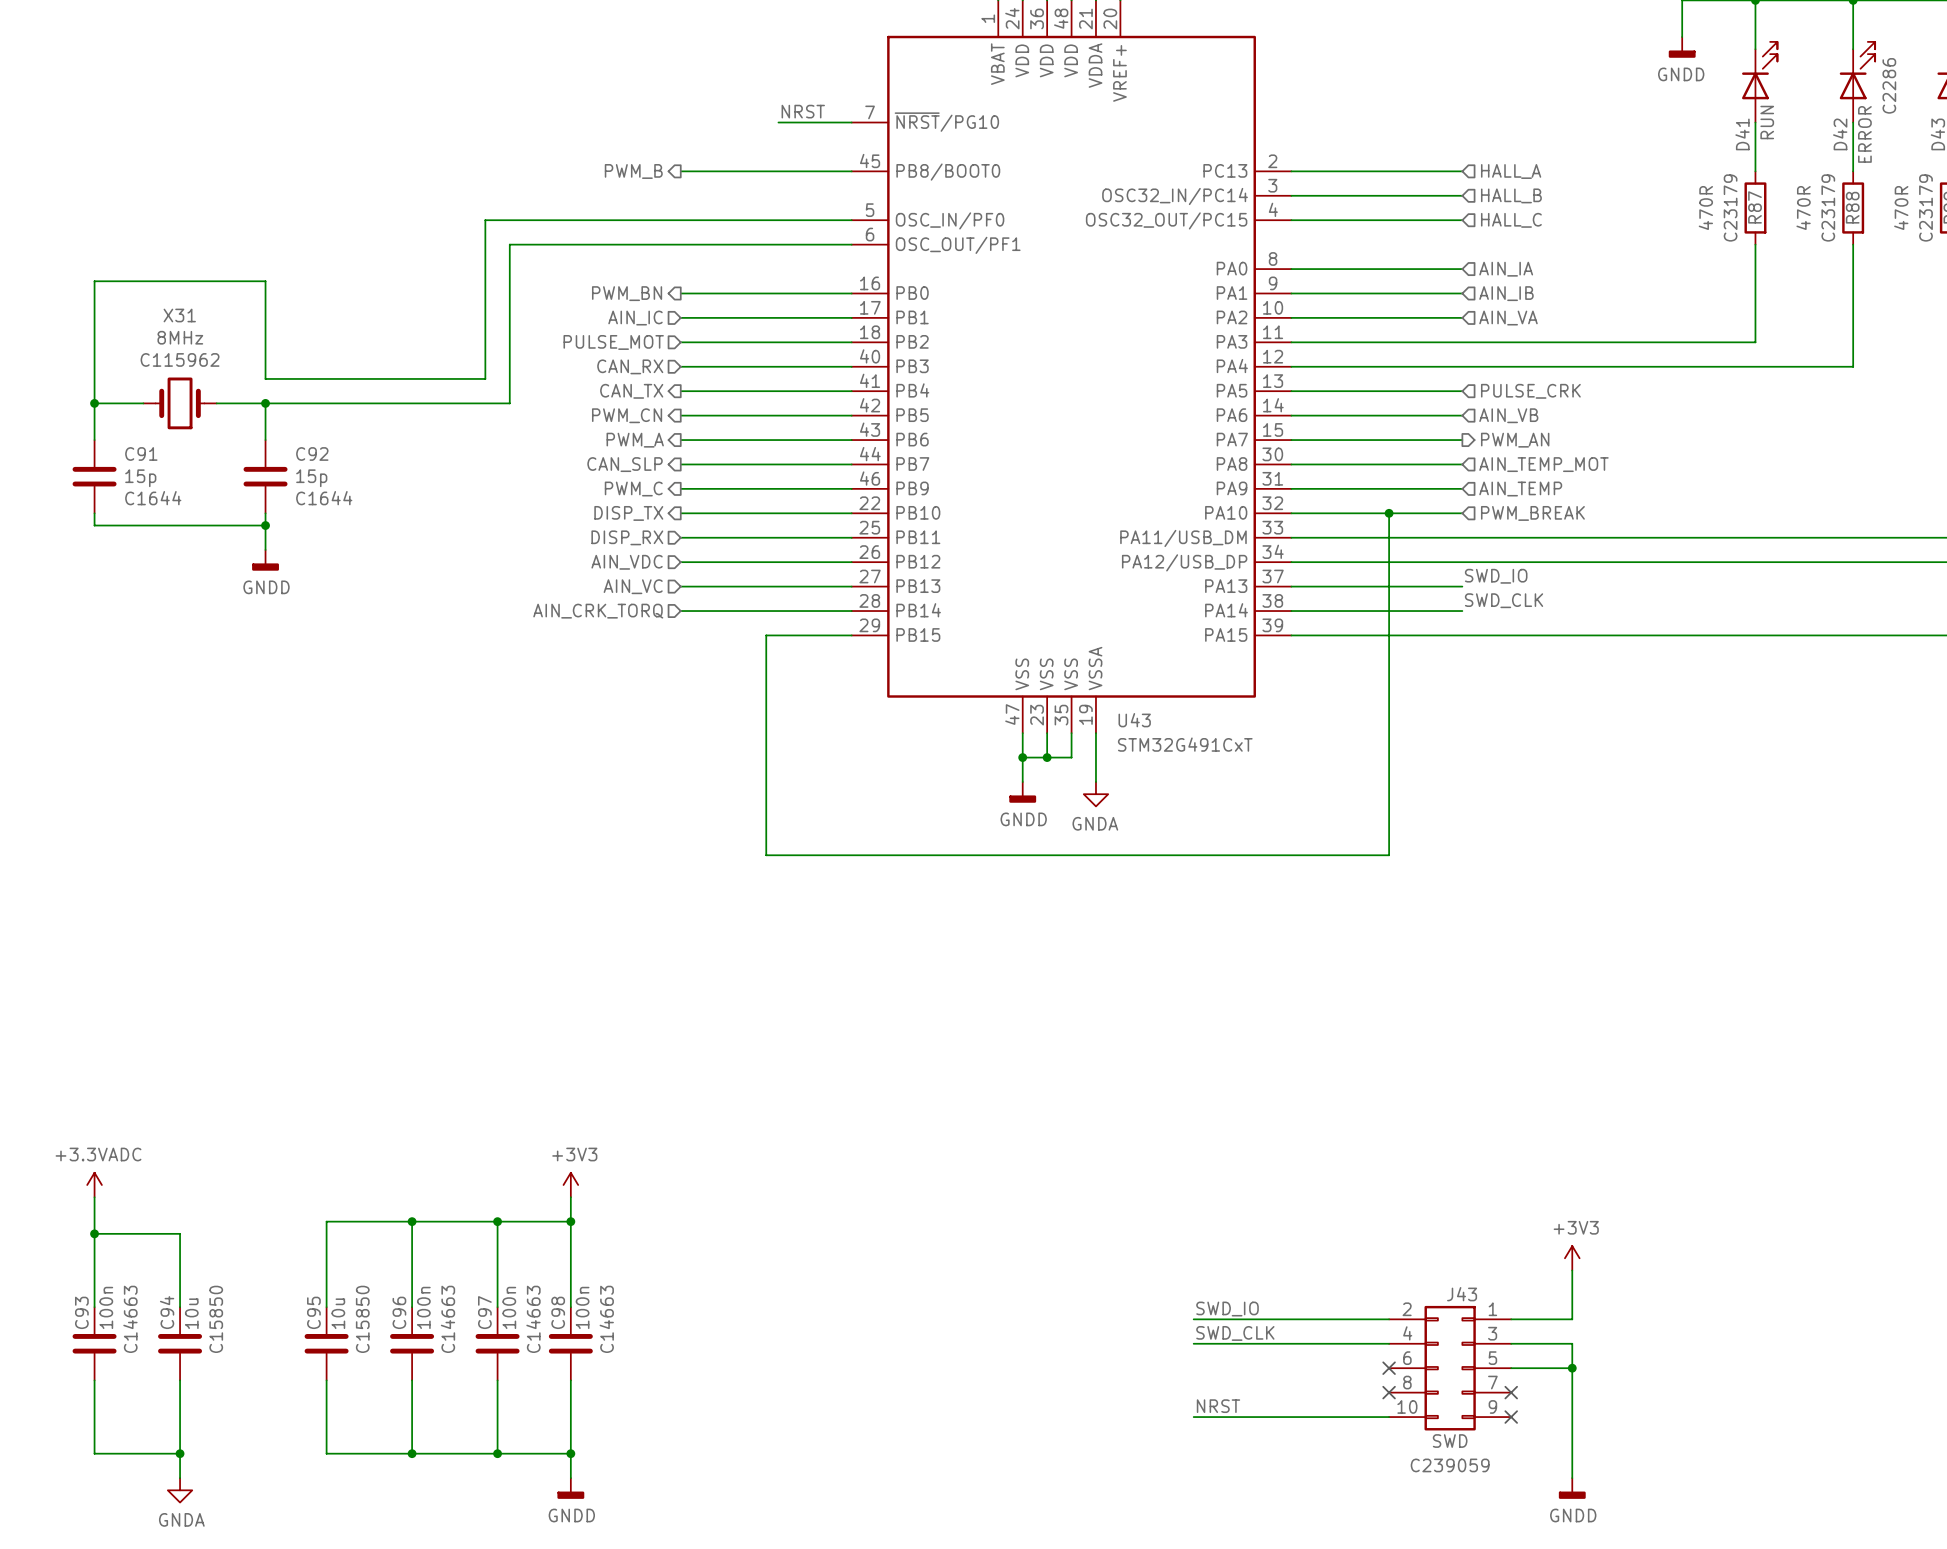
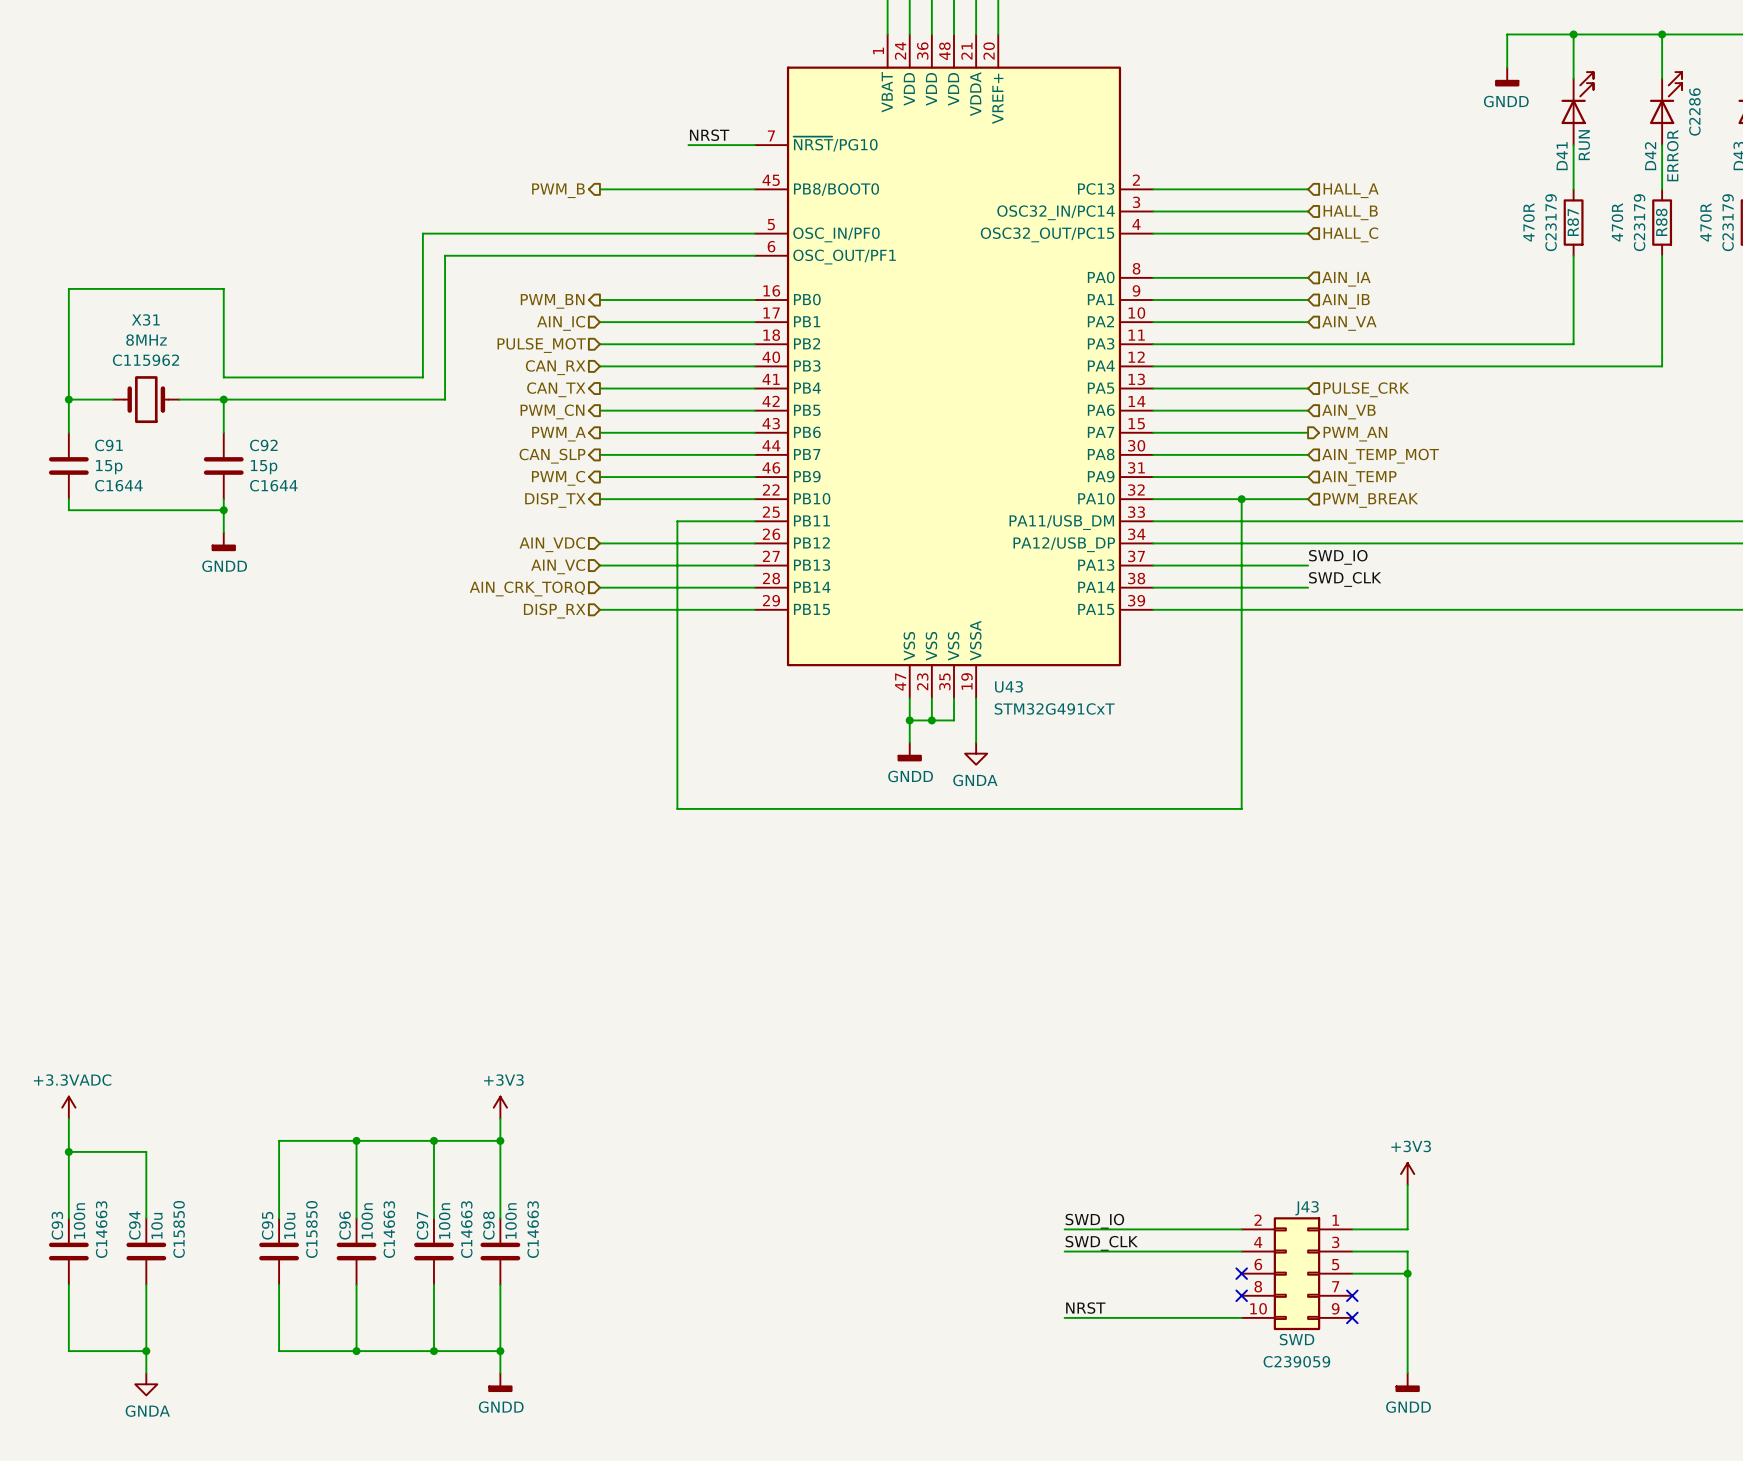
hierarchical label position: DISP_RX (627, 537) -> DISP_RX (554, 611)
wire: (680, 537) (766, 537) -> (599, 609) (677, 609) (677, 521)

